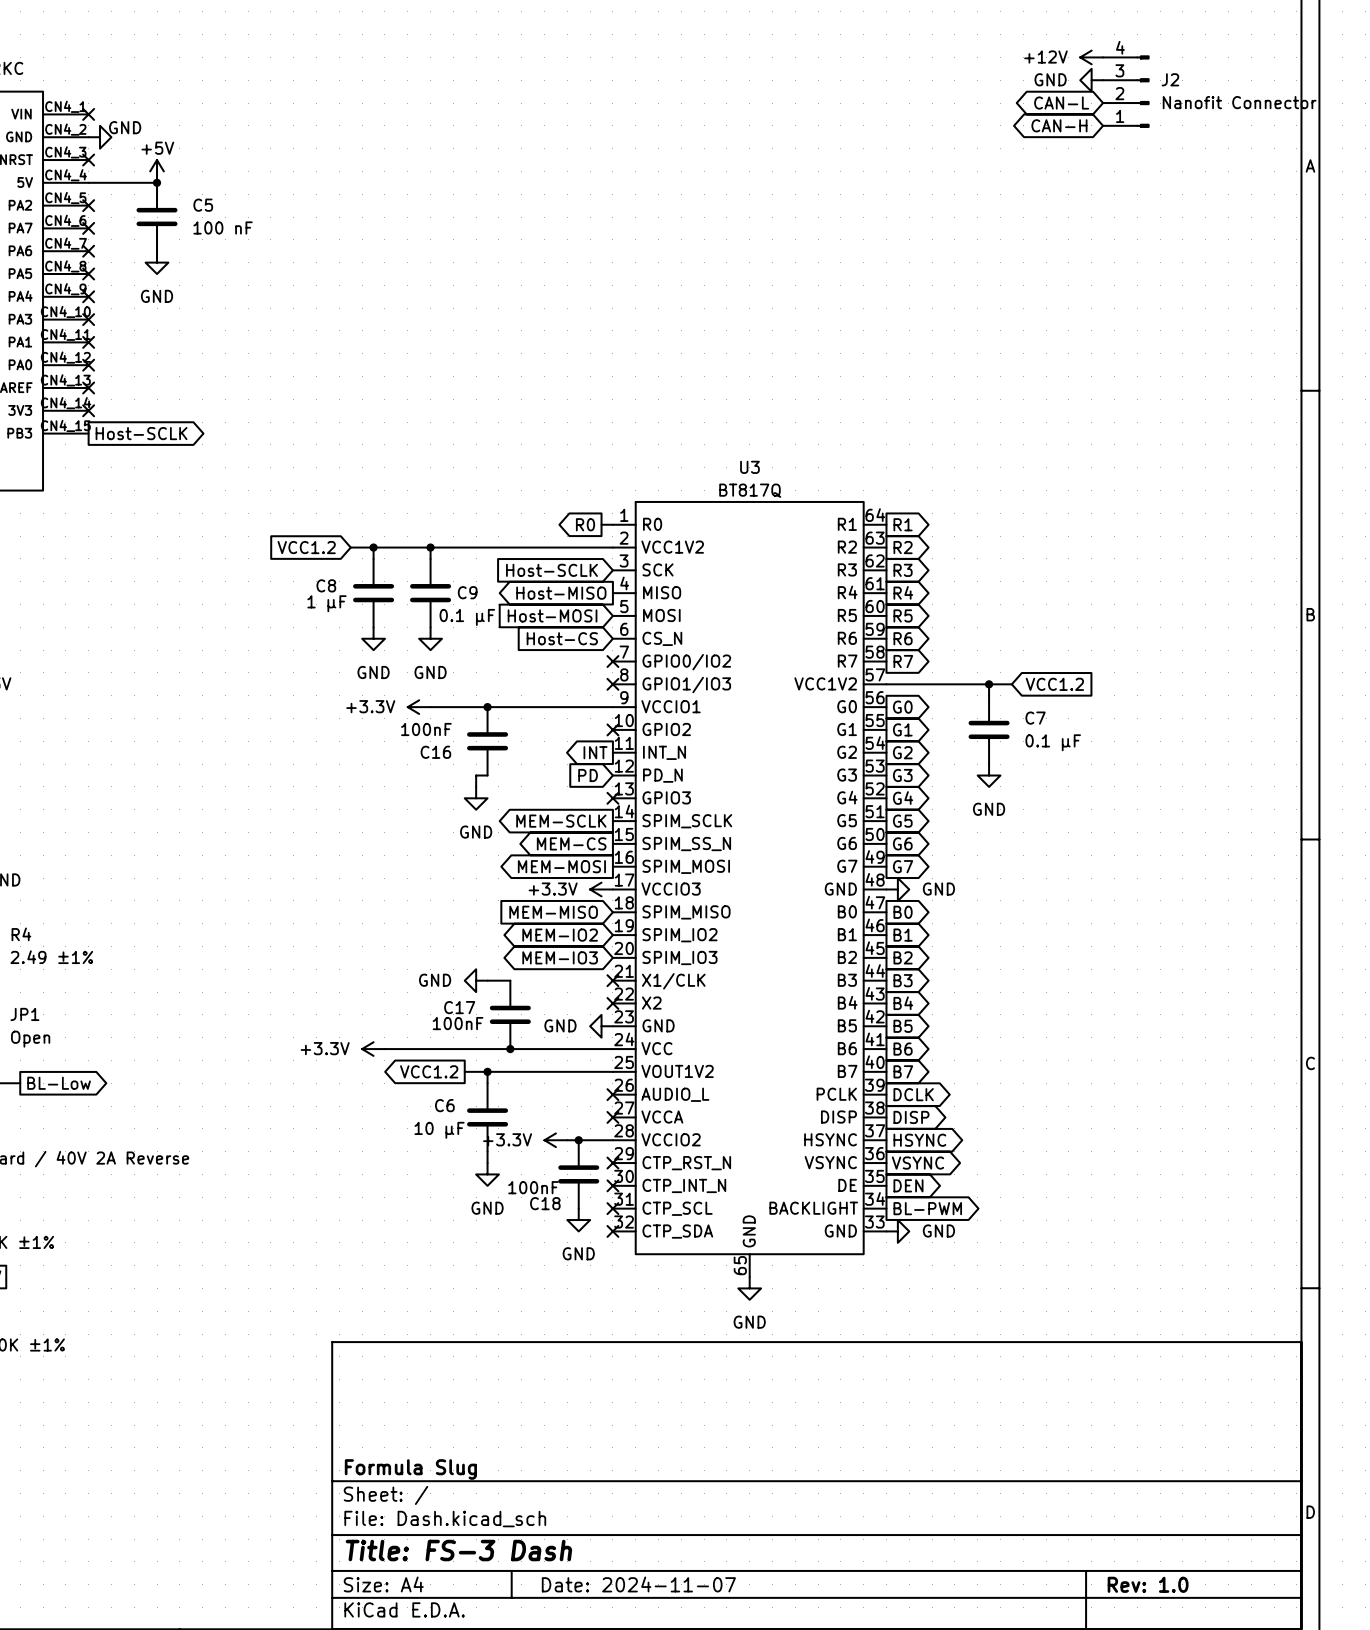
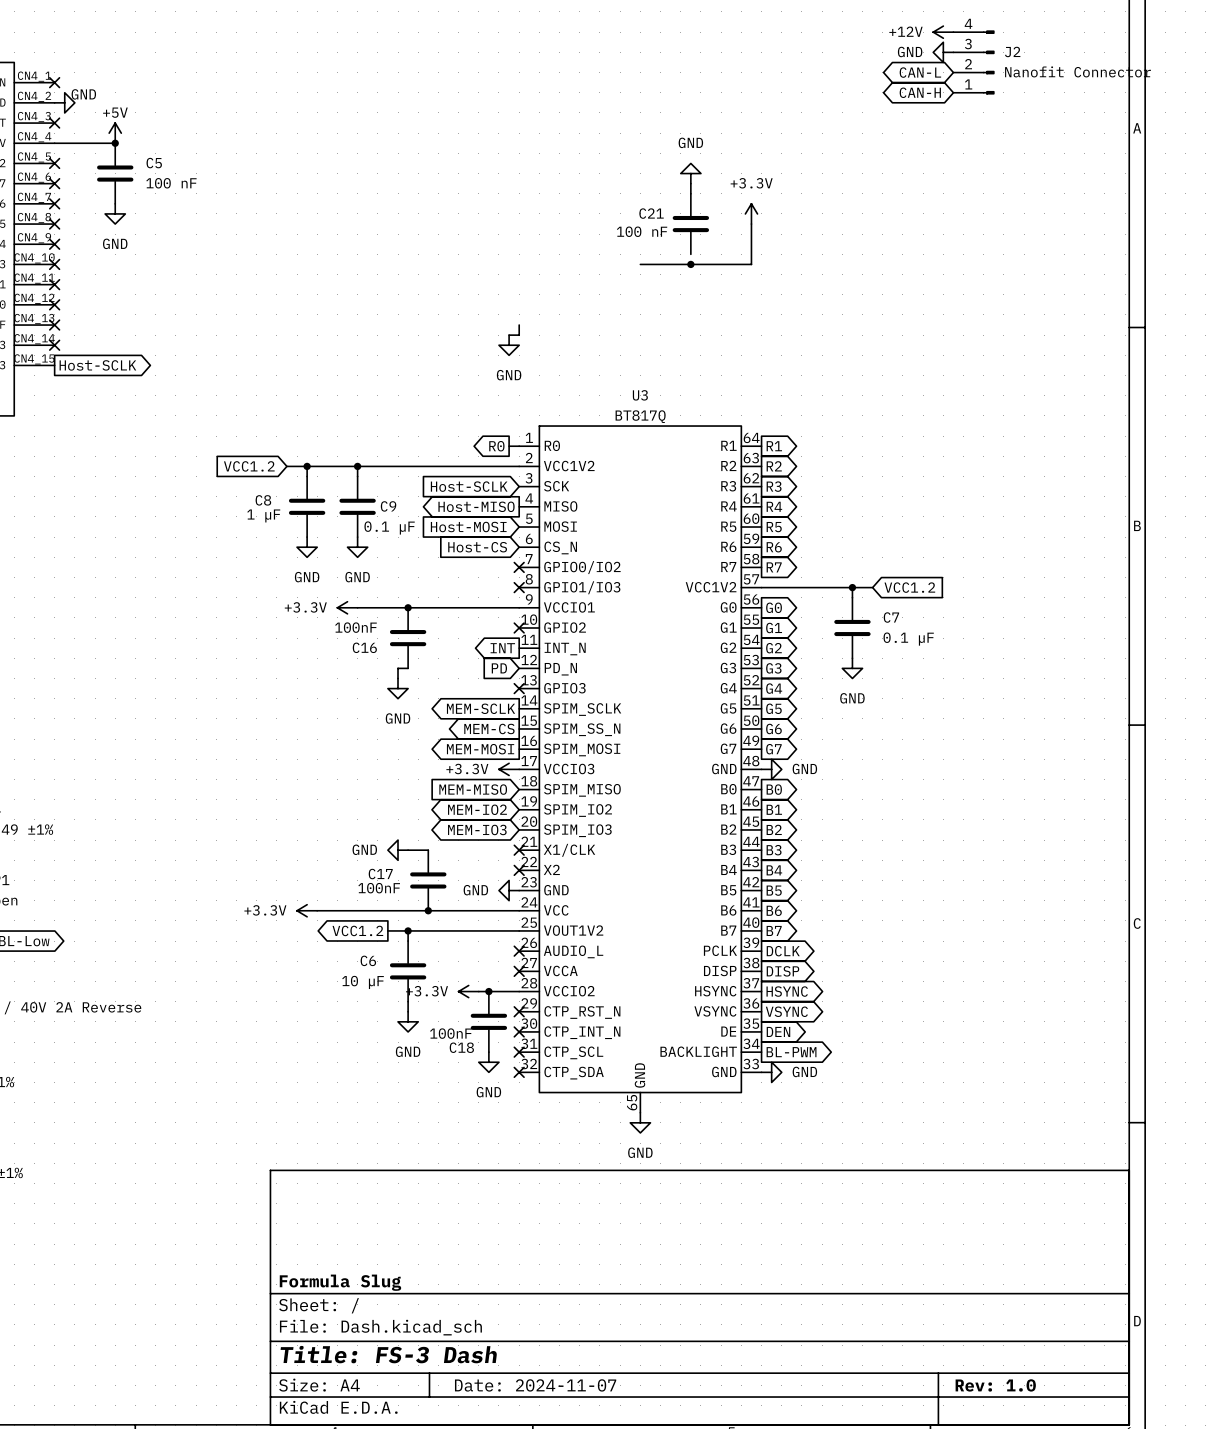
power symbol: none -> GND (690, 173)
wire: none -> (690, 183) (690, 193)
power symbol: none -> +3.3V (751, 213)
C21: none -> 100 nF (690, 224)
wire: none -> (751, 224) (751, 264) (640, 264)
junction: none -> (690, 264)
wire: none -> (519, 325) (519, 335) (509, 335)
power symbol: none -> GND (509, 345)

